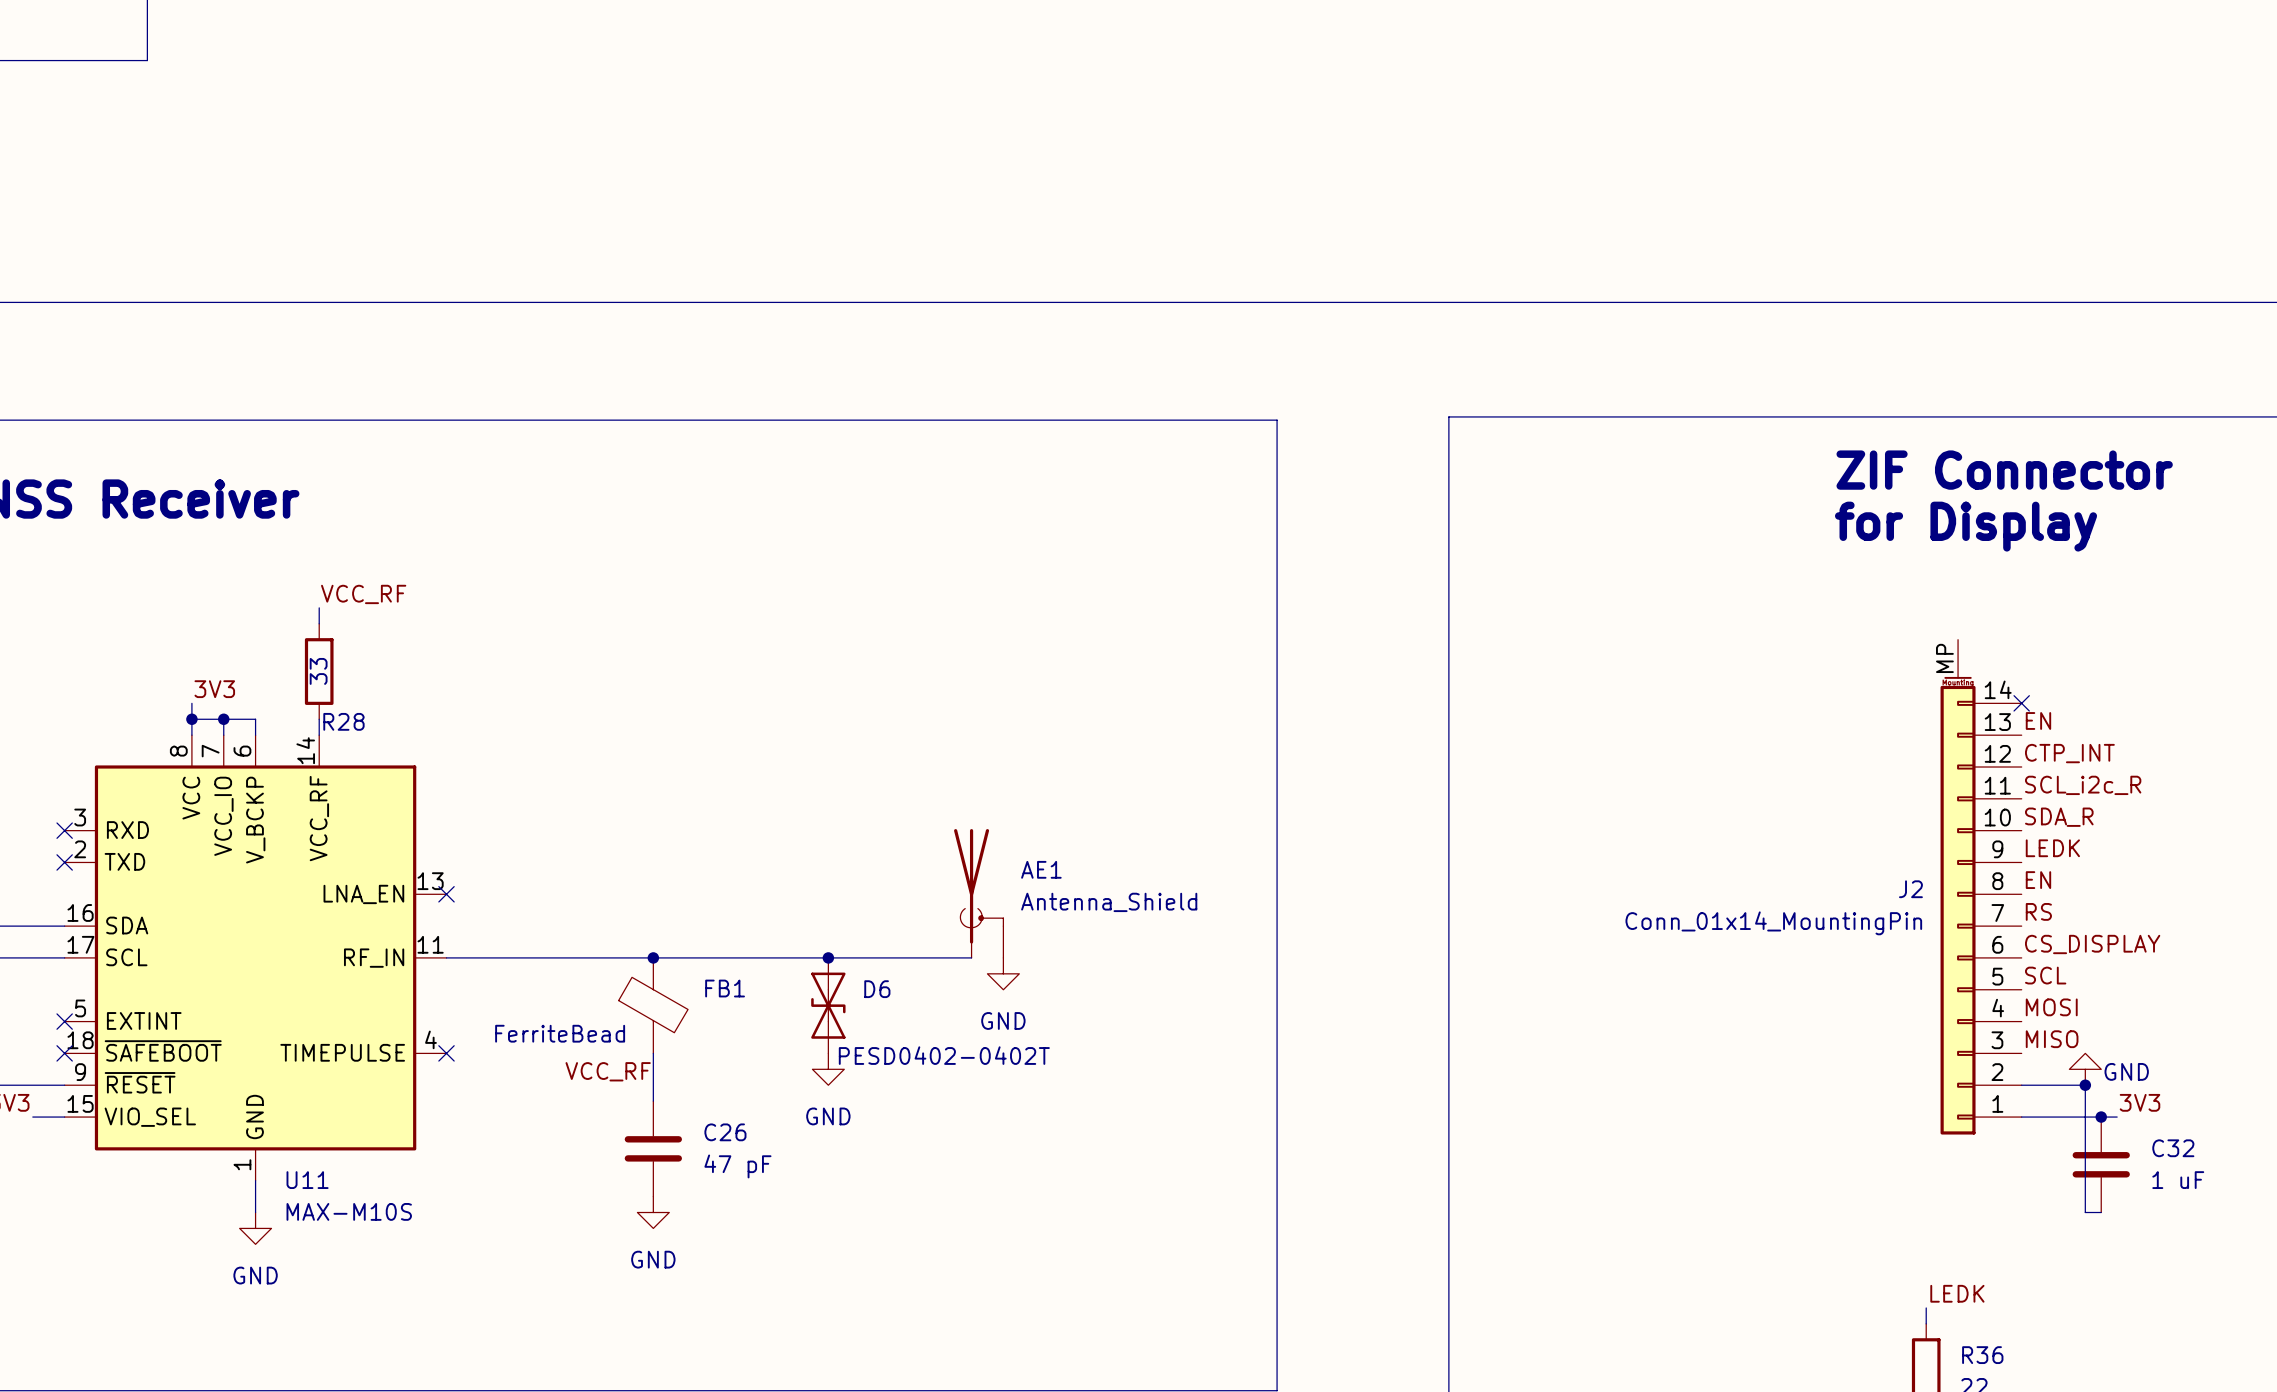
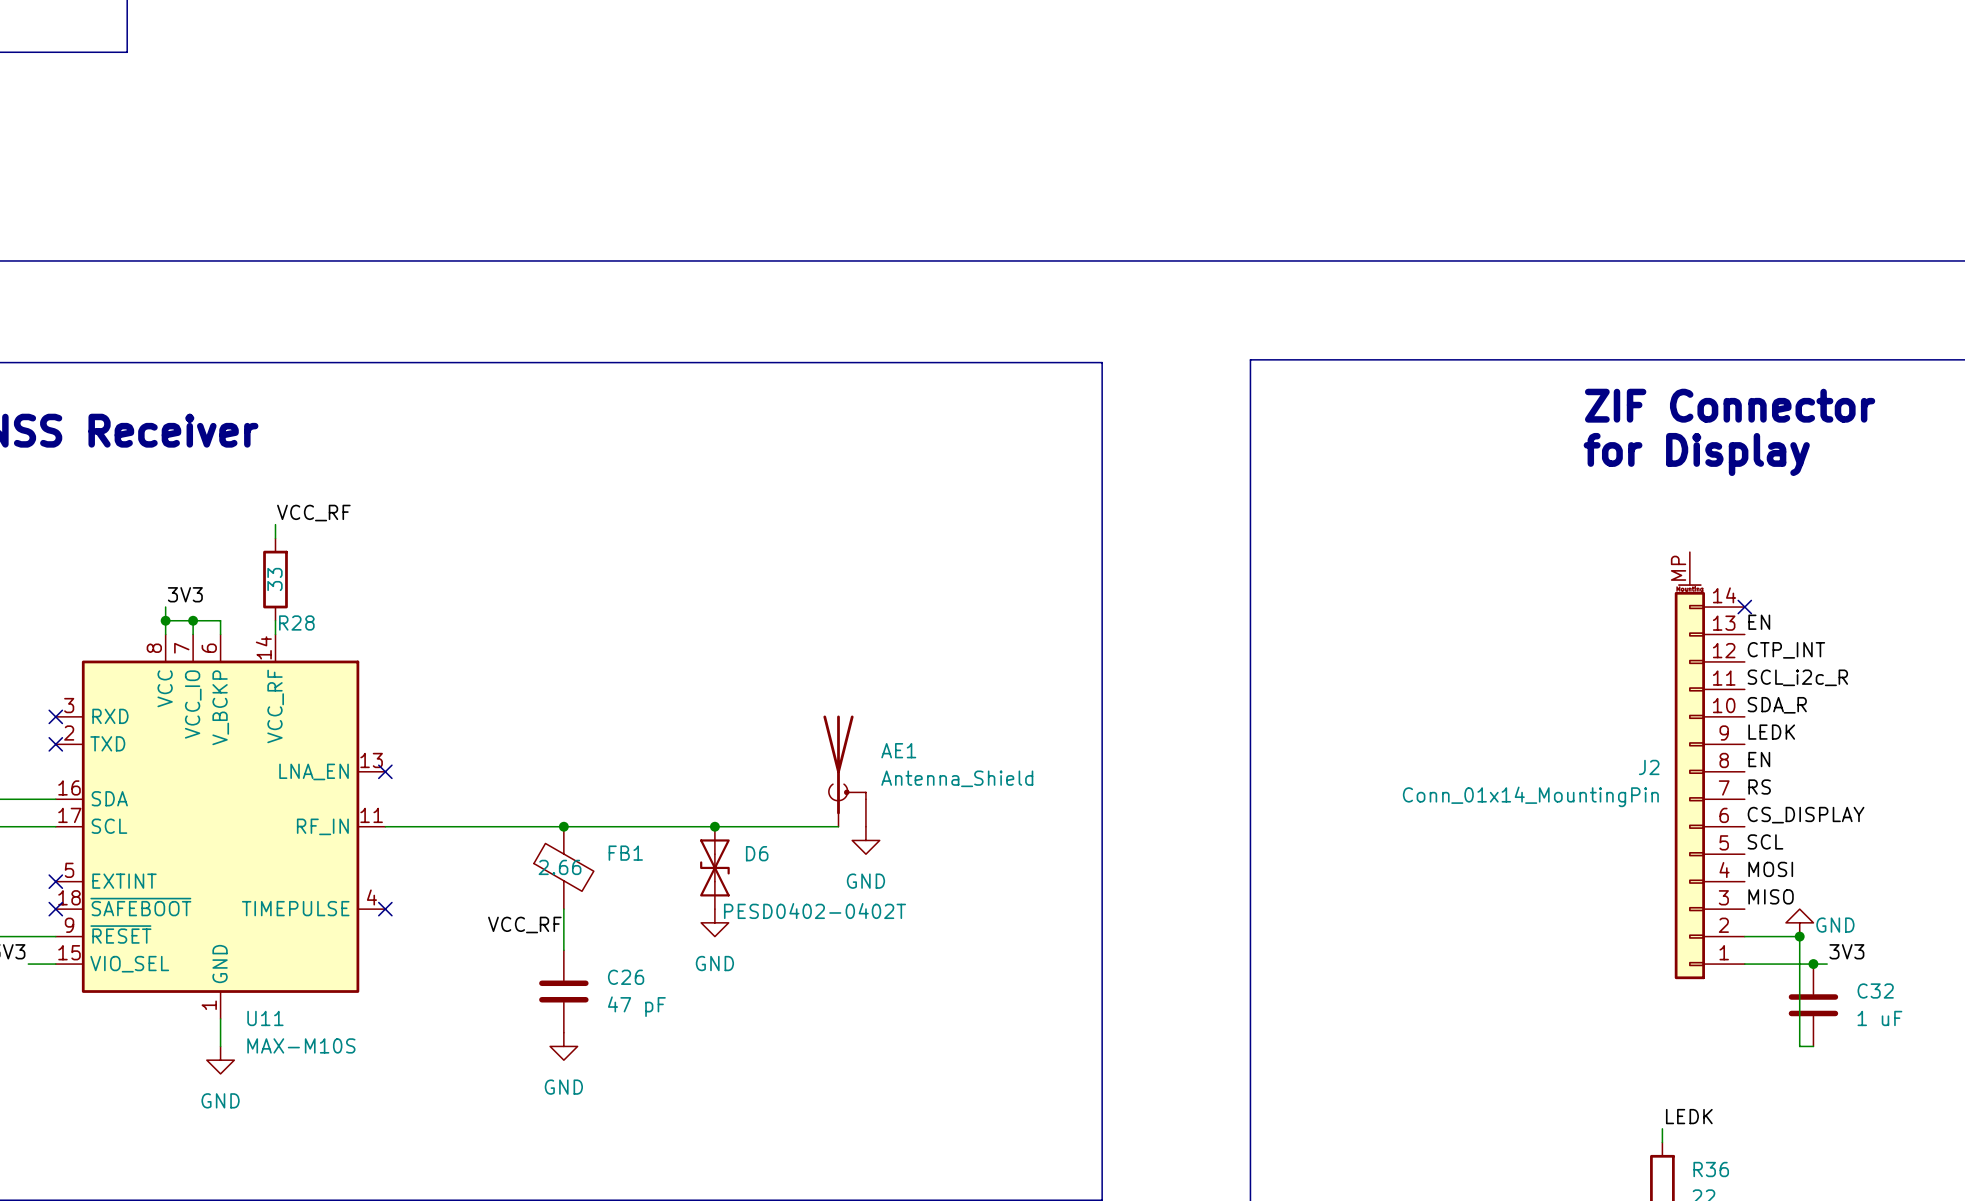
FB1 value: FerriteBead (560, 1033) -> 2.66 (560, 867)

